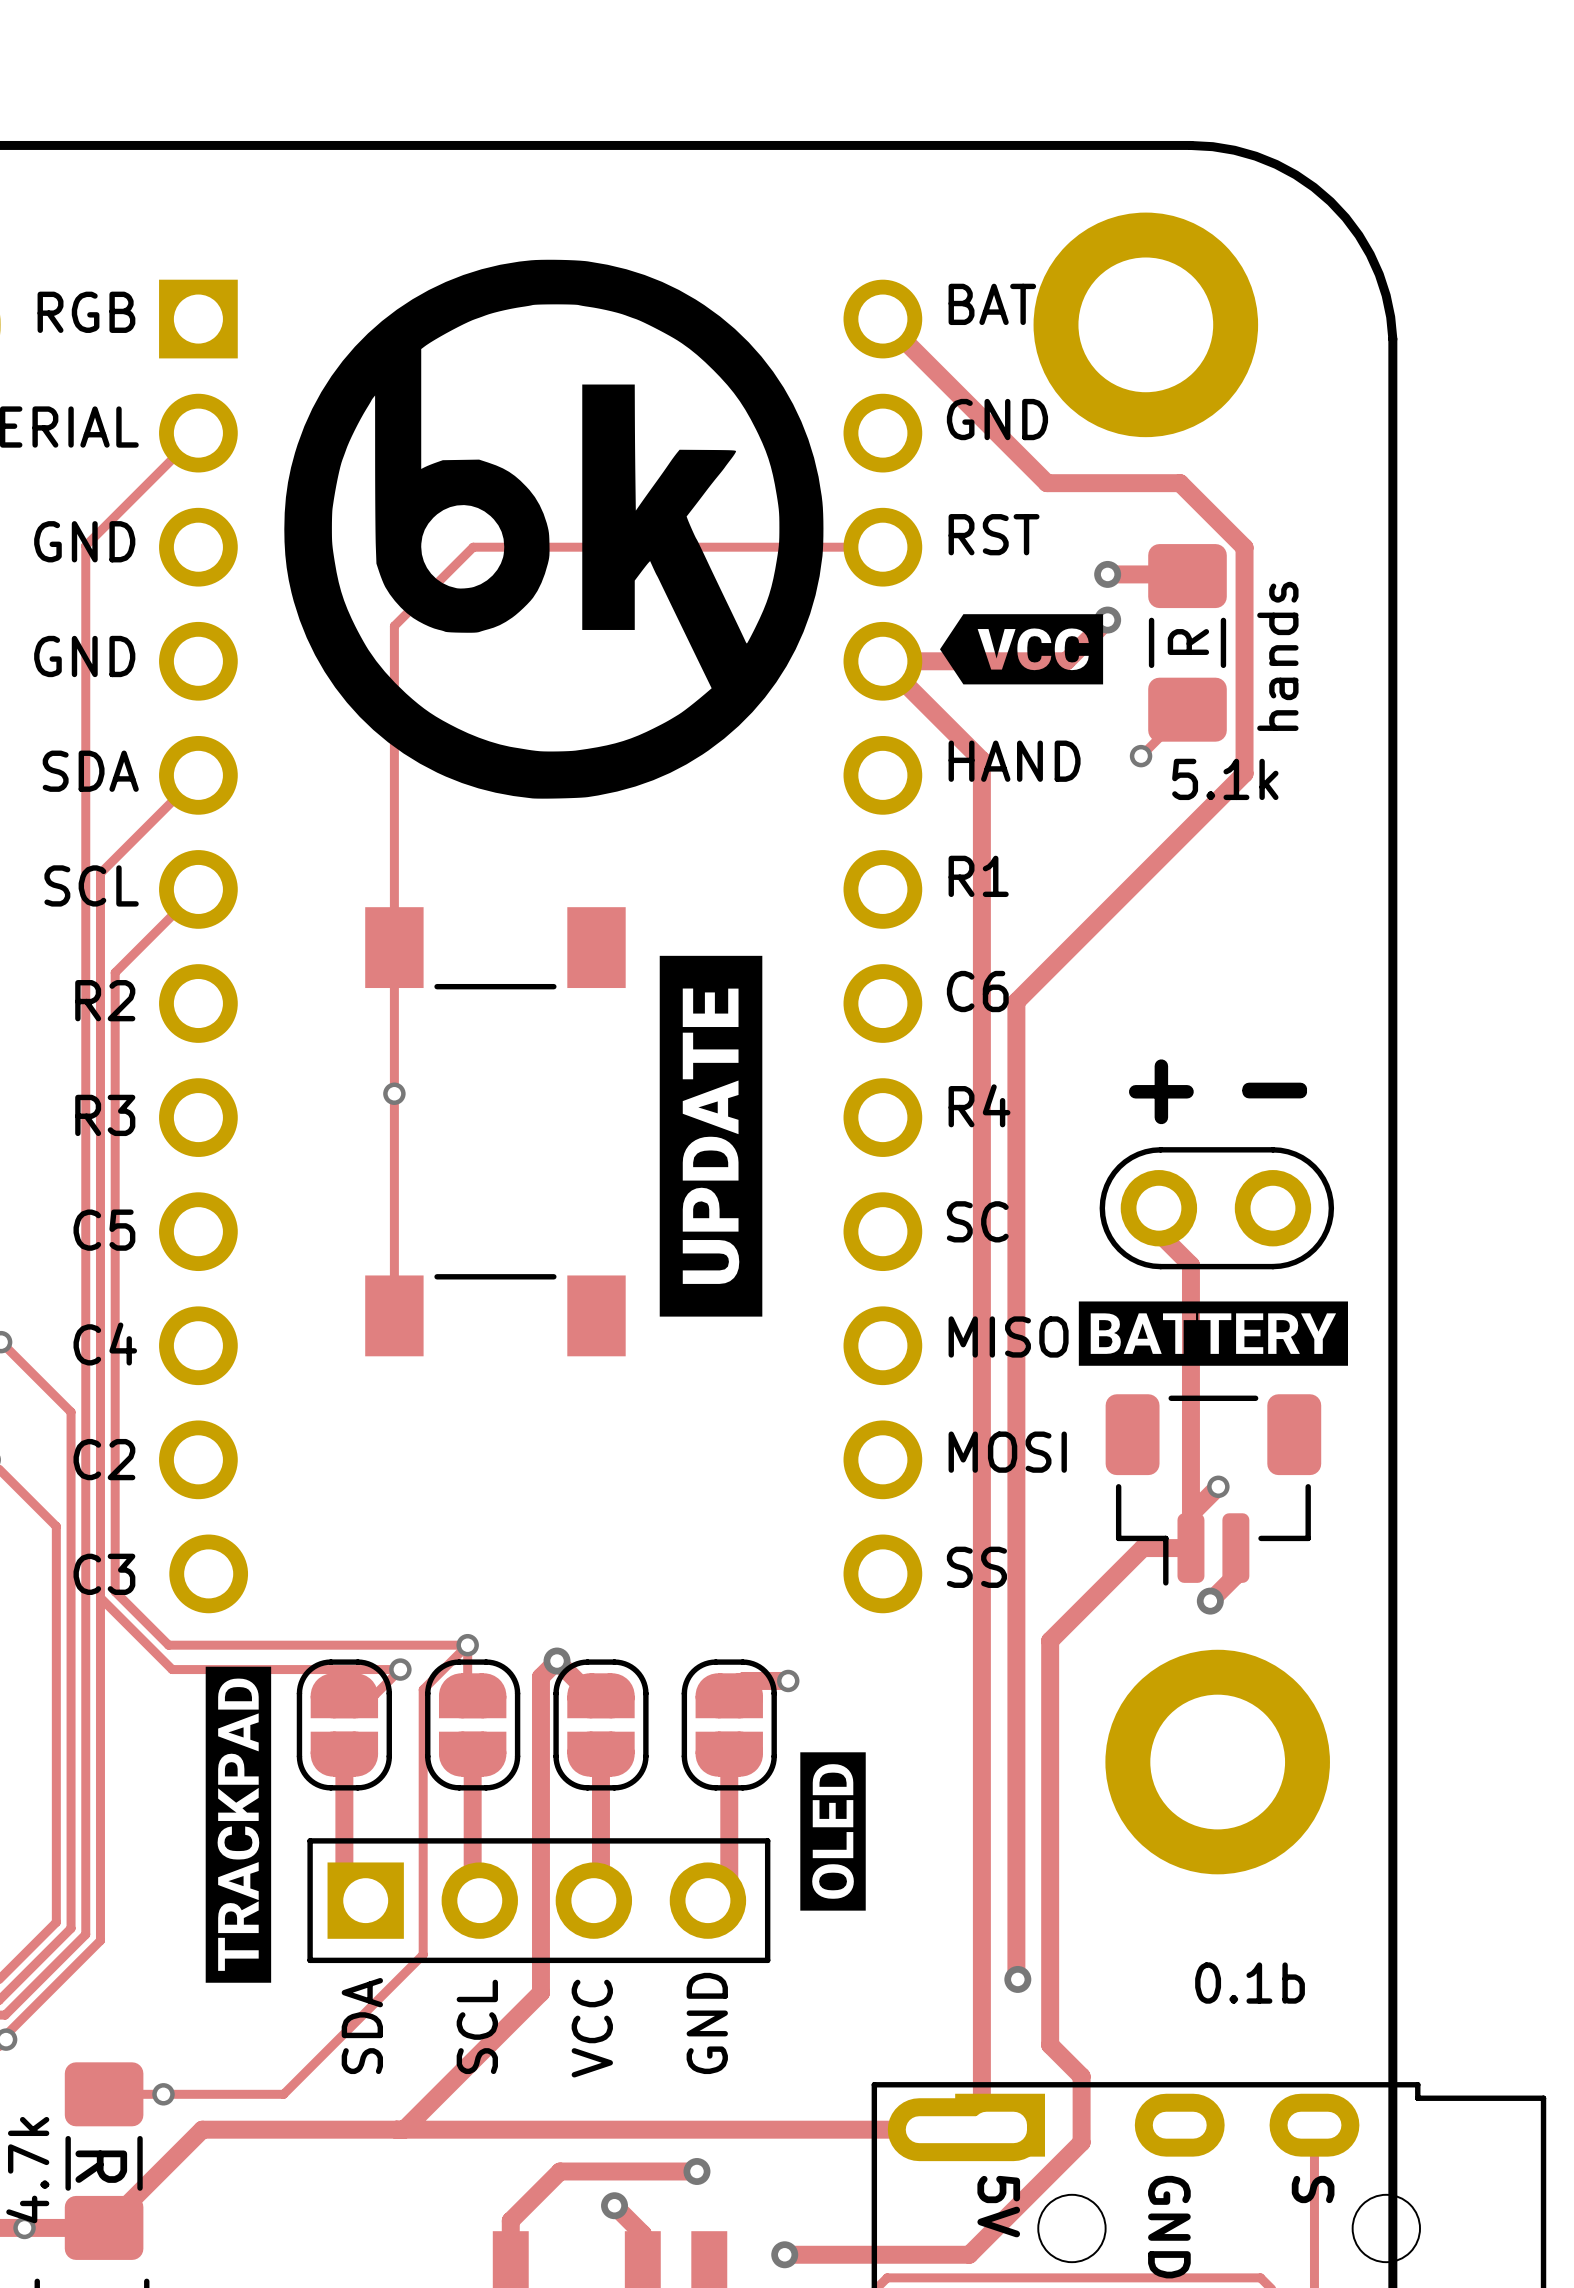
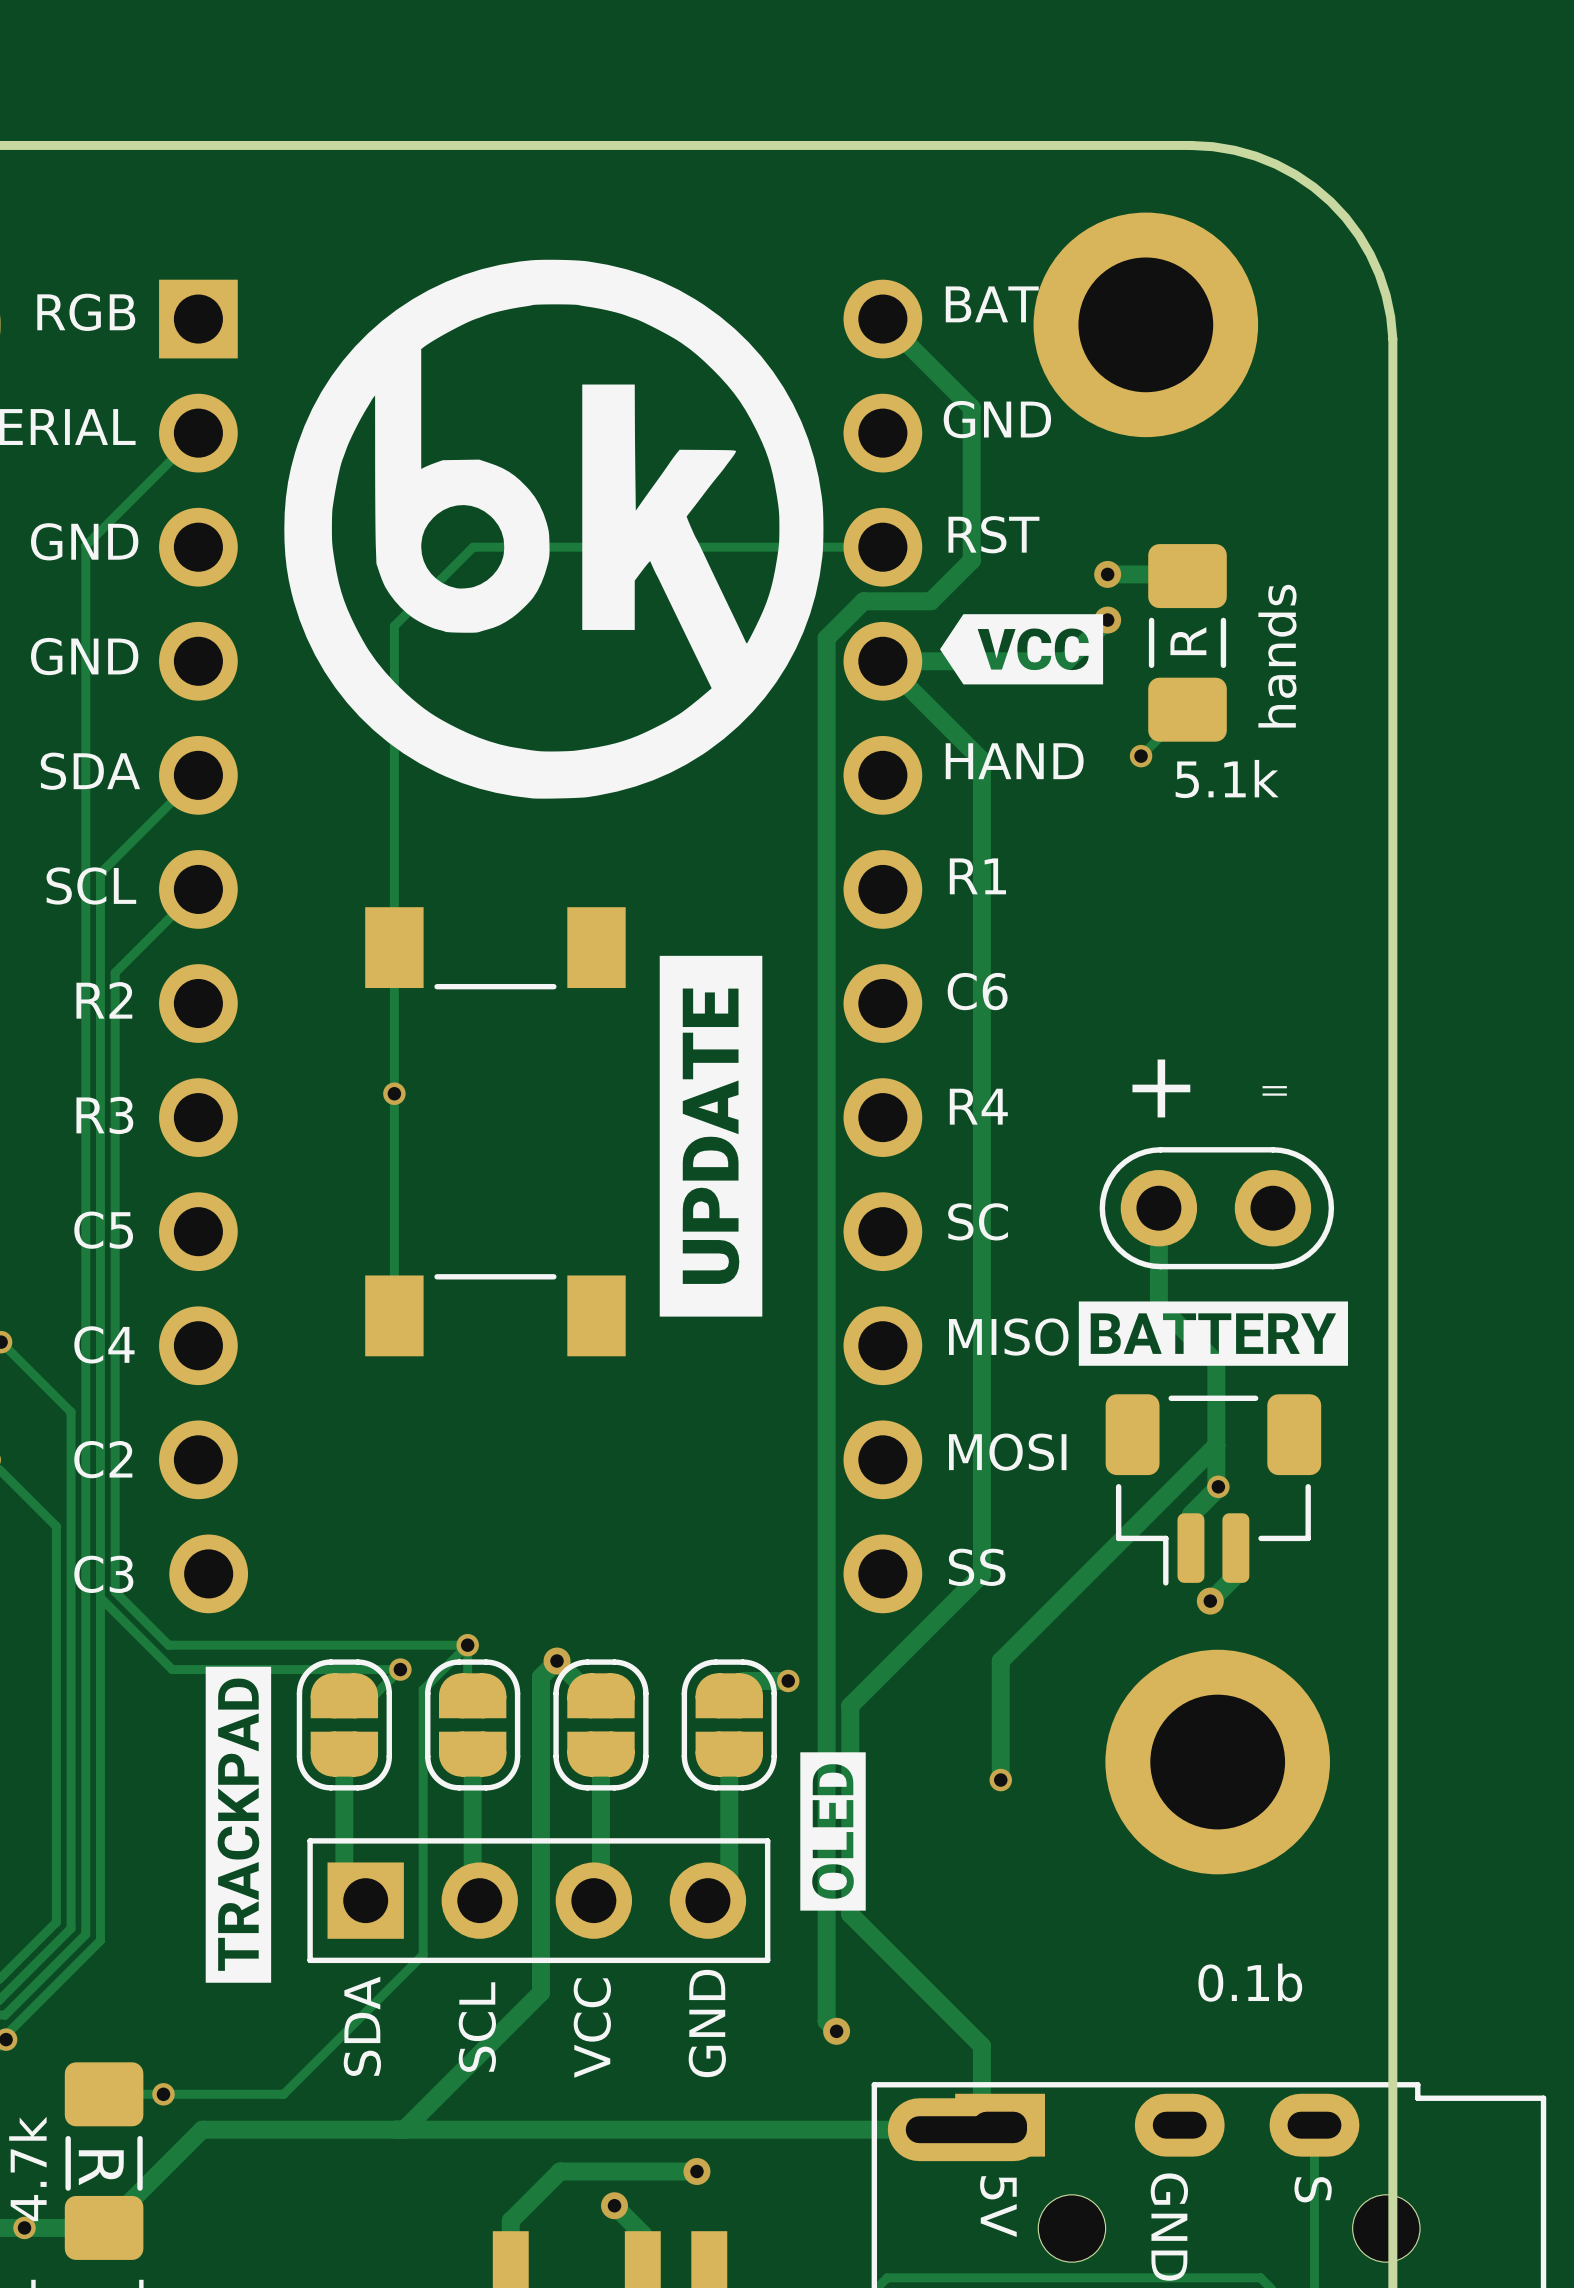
track: (971, 407) (1046, 483) (1180, 483) (1244, 547) (1244, 773) (1016, 1001) (1017, 1979) -> (971, 407) (971, 560) (930, 601) (863, 601) (826, 638) (826, 2021) (836, 2031)
track: (1158, 1233) (1190, 1265) (1190, 1515) -> (1158, 1233) (1158, 1304) (1216, 1362) (1216, 1490) (1190, 1515)
track: none -> (1216, 1445) (1000, 1661) (1000, 1780)
track: (1190, 1548) (1142, 1548) (1050, 1640) (1050, 2045) (1081, 2076) (1081, 2142) (969, 2254) (784, 2254) -> none
track: (981, 1574) (981, 2045) -> (981, 1574) (850, 1705) (850, 1914) (981, 2045)
via: none -> (1000, 1780)
via: (1017, 1979) -> none
via: none -> (836, 2031)
via: (784, 2254) -> none

